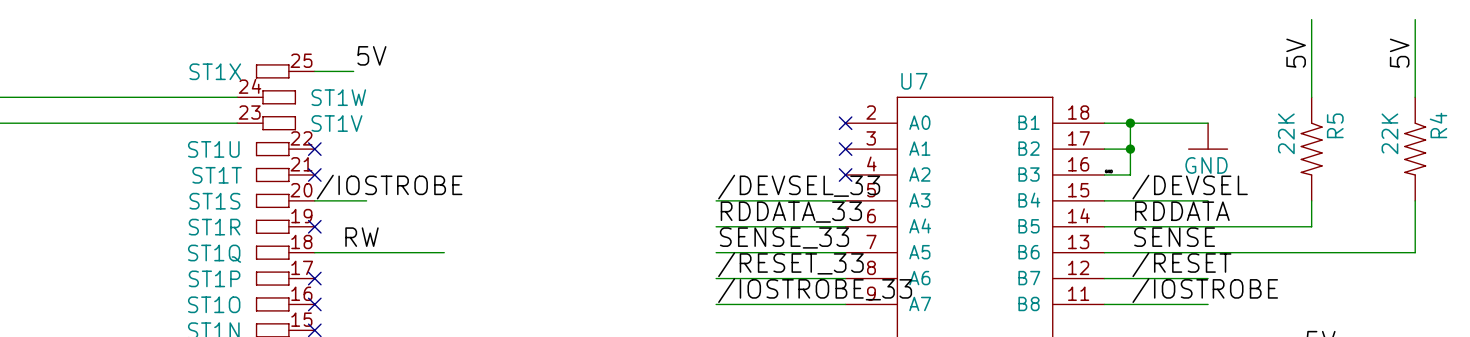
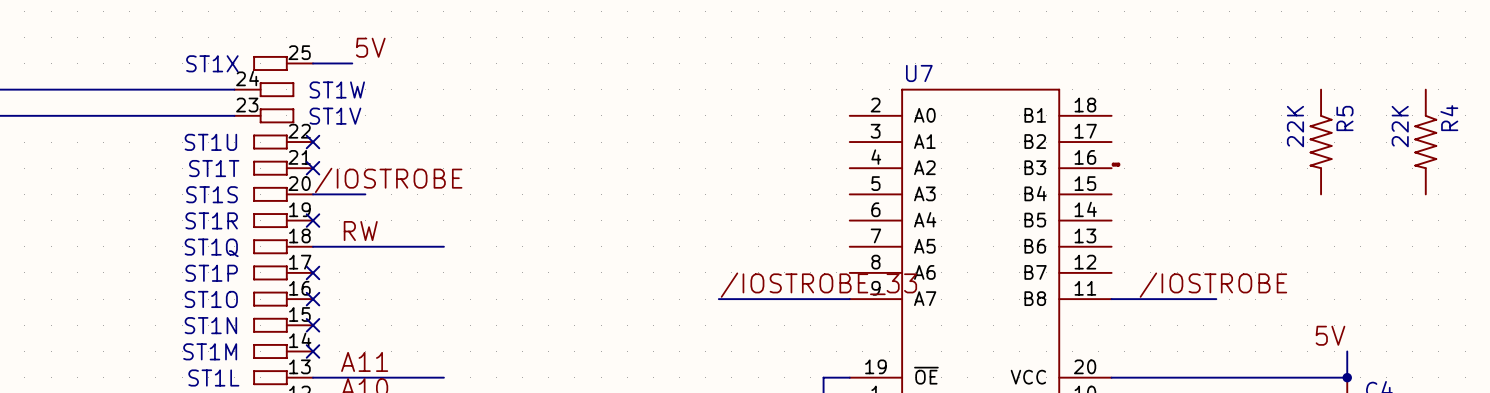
wire: (1311, 19) (1311, 97) -> none
wire: (1415, 19) (1415, 97) -> none
label: 5V (1296, 53) -> none
label: 5V (1399, 53) -> none
no-connect mark: (845, 123) -> none
wire: (1104, 123) (1208, 123) -> none
wire: (1130, 123) (1130, 174) (1104, 174) -> none
junction: (1130, 123) -> none
power symbol: GND (1208, 136) -> none
no-connect mark: (845, 149) -> none
wire: (1104, 149) (1130, 149) -> none
junction: (1130, 149) -> none
no-connect mark: (845, 174) -> none
label: /DEVSEL_33 (799, 187) -> none
label: /DEVSEL (1190, 187) -> none
wire: (716, 200) (845, 200) -> none
wire: (1104, 200) (1208, 200) -> none
wire: (1311, 200) (1311, 226) (1104, 226) -> none
wire: (1415, 200) (1415, 252) (1104, 252) -> none
label: RDDATA (1182, 211) -> none
label: RDDATA_33 (791, 212) -> none
wire: (716, 226) (845, 226) -> none
label: SENSE_33 (784, 237) -> none
label: SENSE (1174, 237) -> none
wire: (716, 252) (845, 252) -> none
label: /RESET_33 (790, 264) -> none
label: /RESET (1181, 264) -> none
wire: (716, 278) (845, 278) -> none
wire: (1104, 278) (1208, 278) -> none

